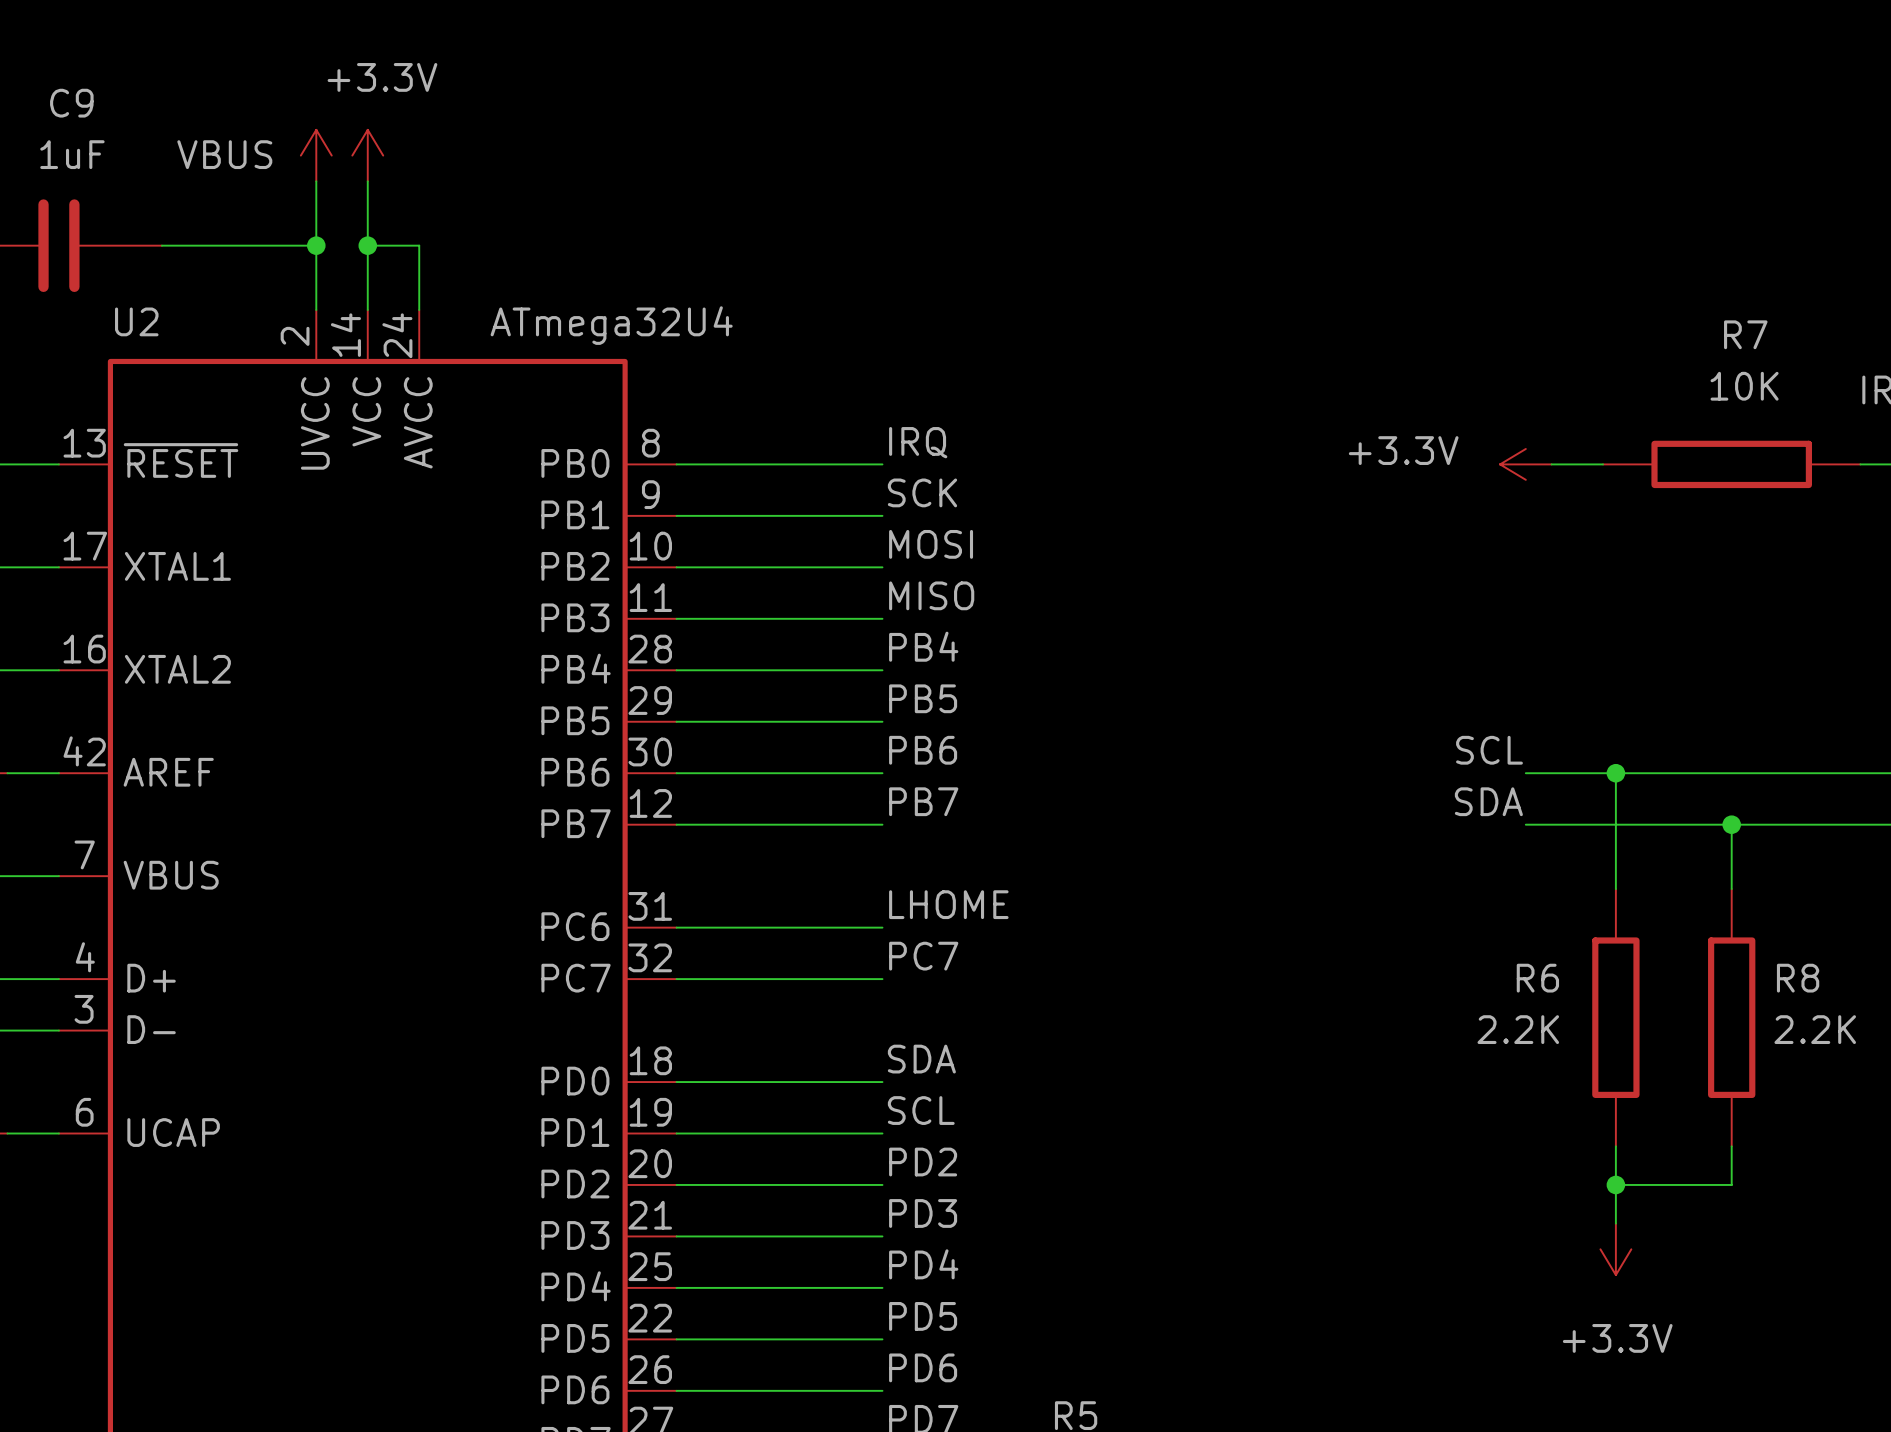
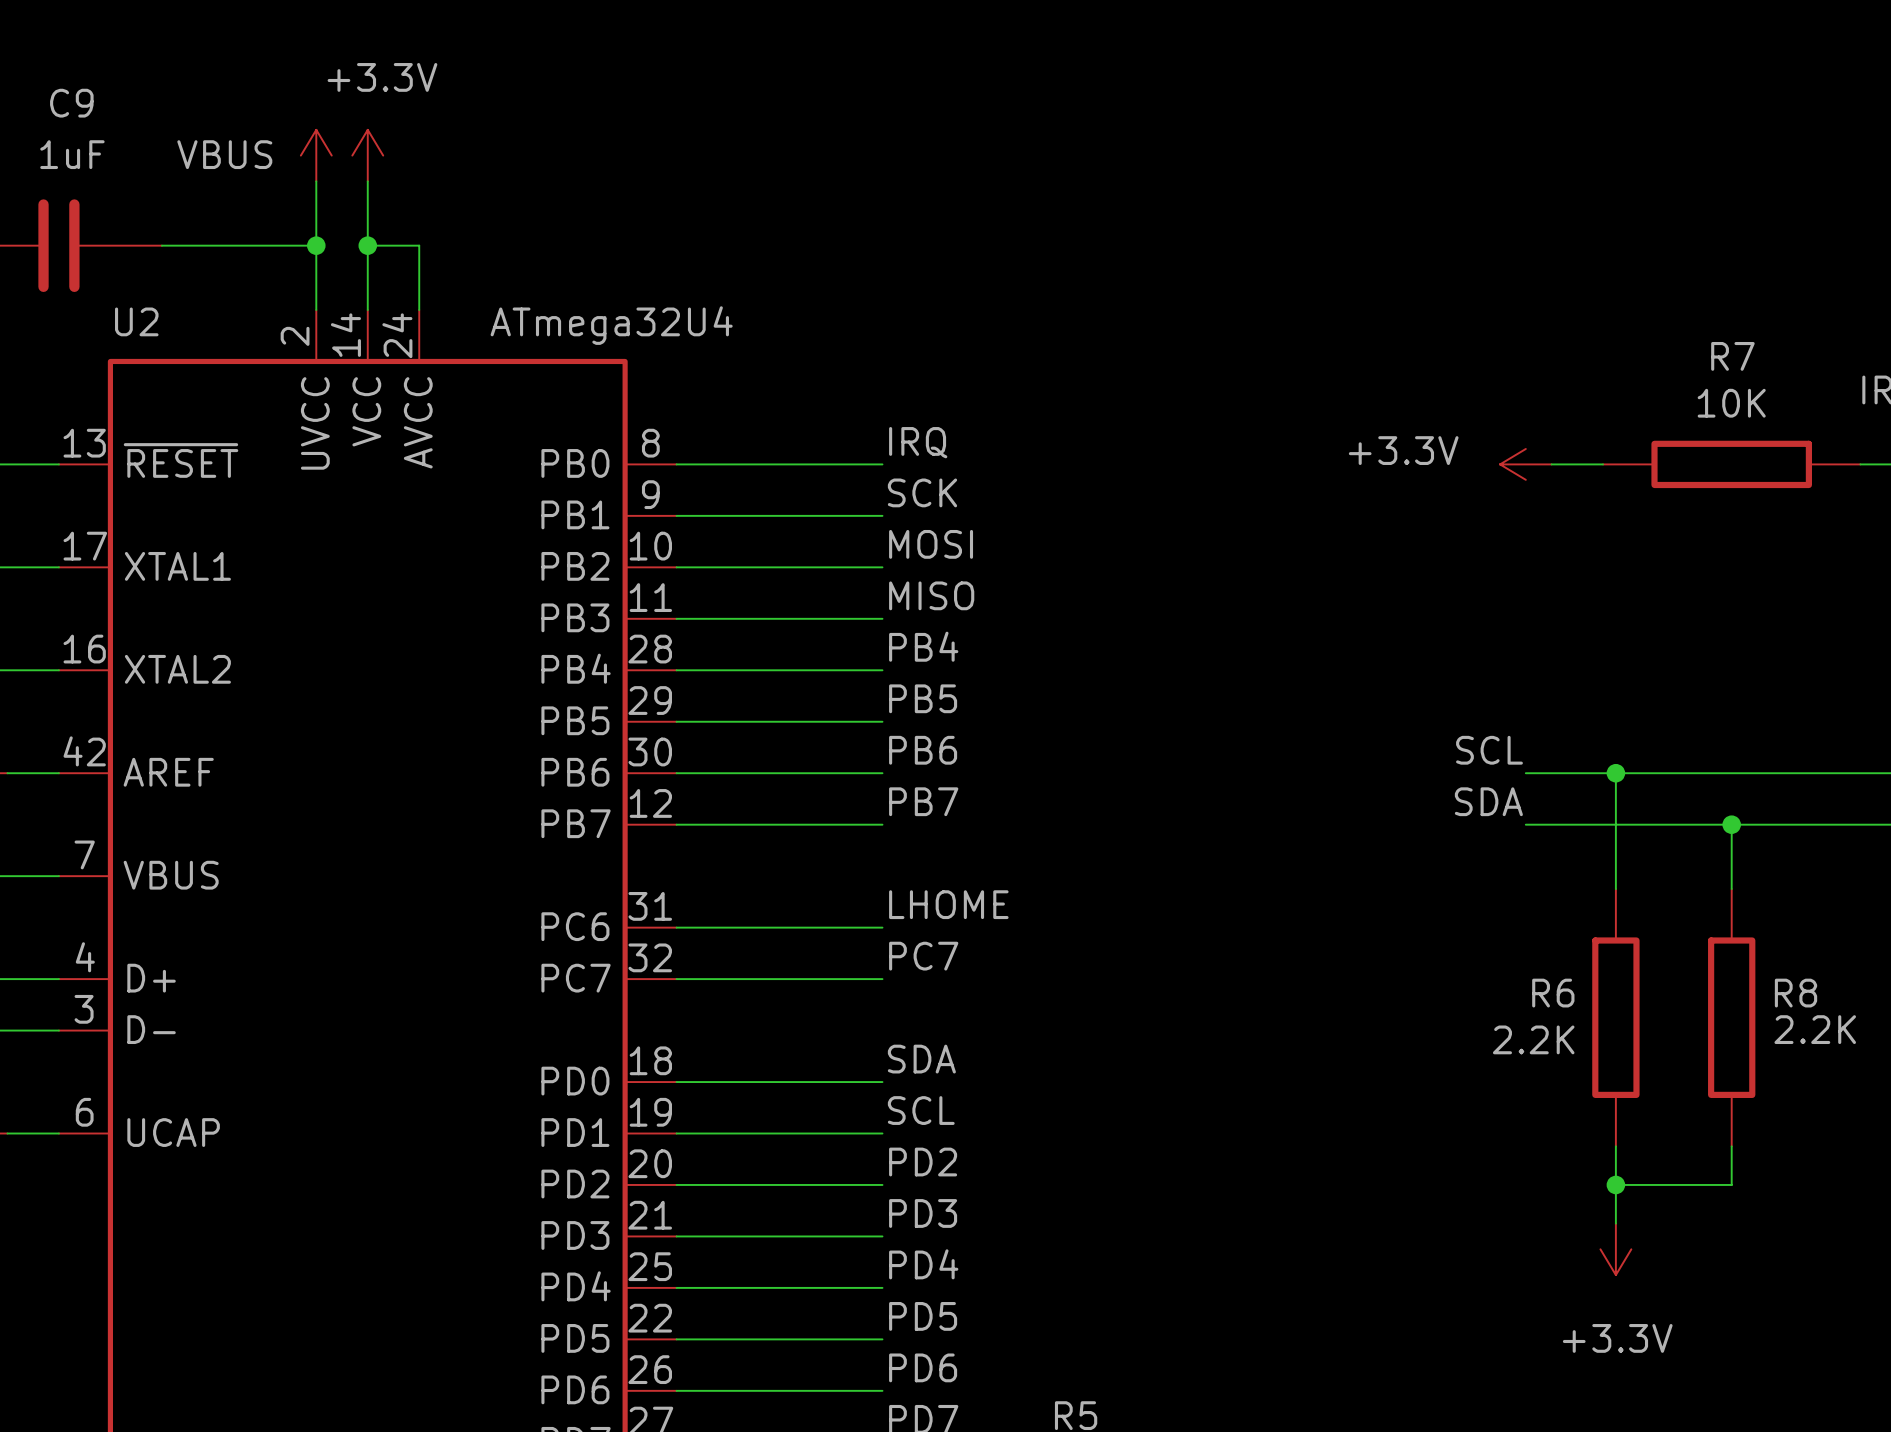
R7 name position: R7 (1745, 334) -> R7 (1732, 356)
R7 value position: 10K (1744, 386) -> 10K (1731, 403)
R6 name position: R6 (1537, 978) -> R6 (1553, 993)
R8 name position: R8 (1798, 978) -> R8 (1796, 993)
R6 value position: 2.2K (1518, 1029) -> 2.2K (1533, 1039)

